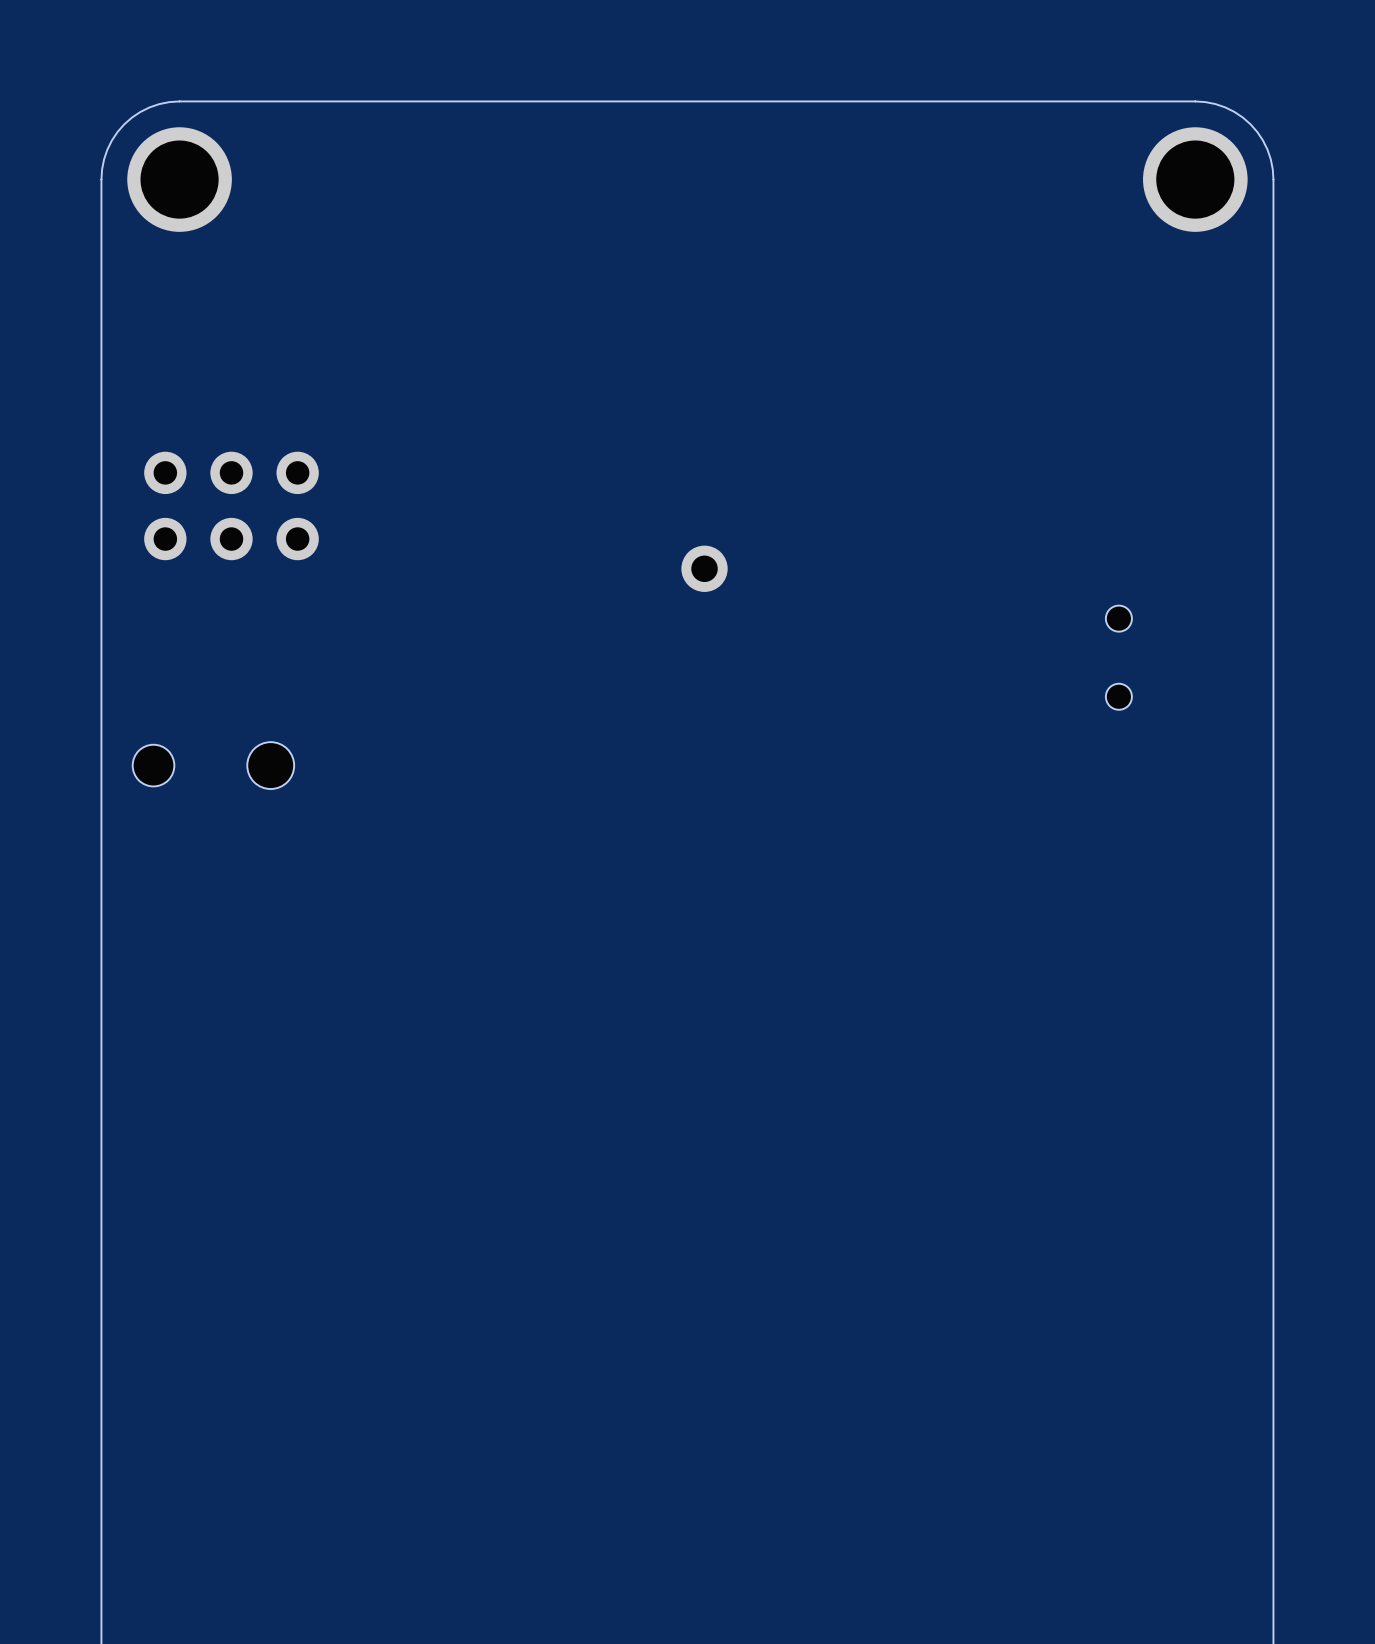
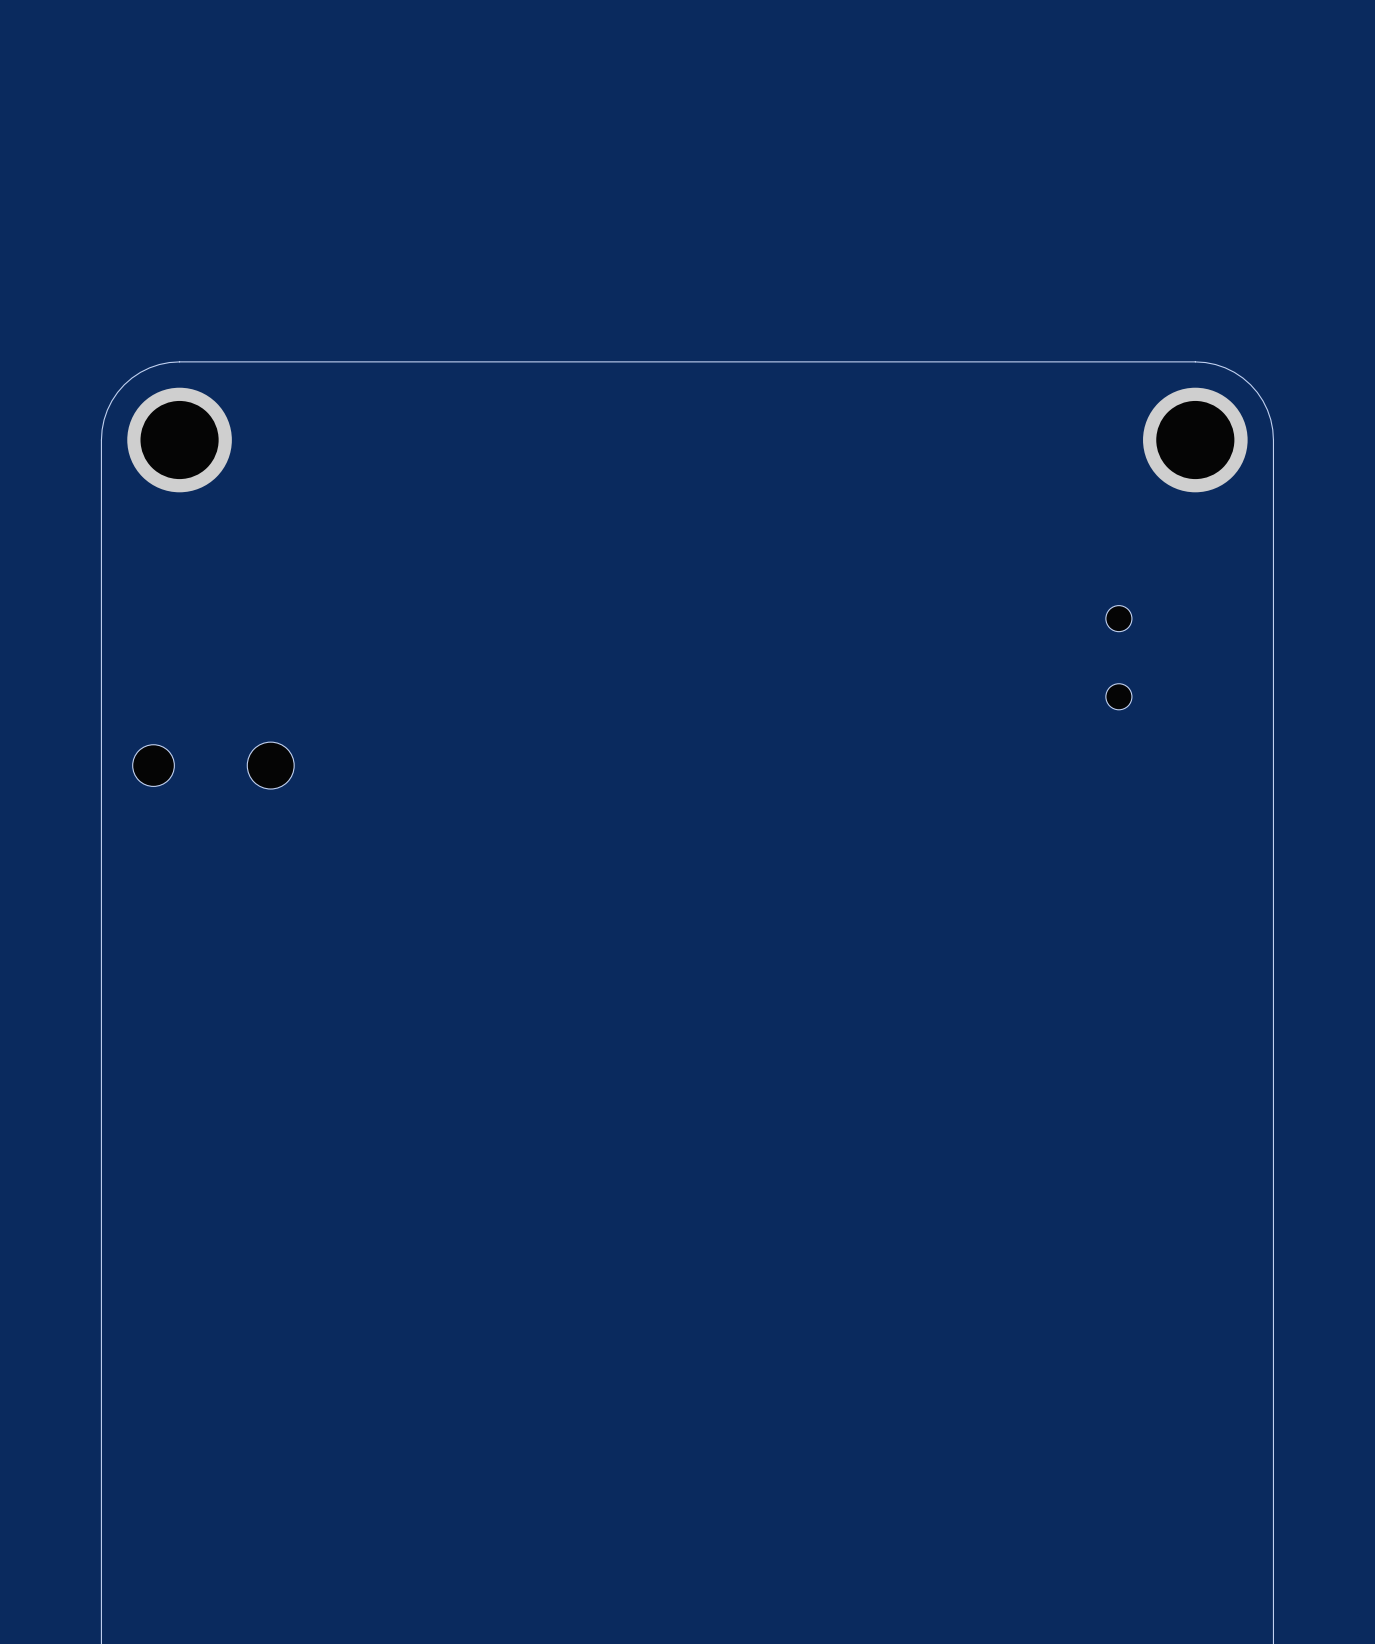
part position: (179, 179) -> (179, 440)
part position: (1195, 179) -> (1195, 440)
board edge: (1273, 440) (1273, 179) (1270, 159) (1257, 132) (1242, 117) (1215, 104) (1195, 101) (179, 101) (159, 104) (132, 117) (117, 132) (107, 149) (102, 169) (101, 440) -> (1273, 440) (1267, 410) (1250, 384) (1225, 367) (1195, 361) (169, 362) (140, 372) (117, 392) (104, 419) (101, 440)
part: (231, 505) -> none
part: (704, 568) -> none

